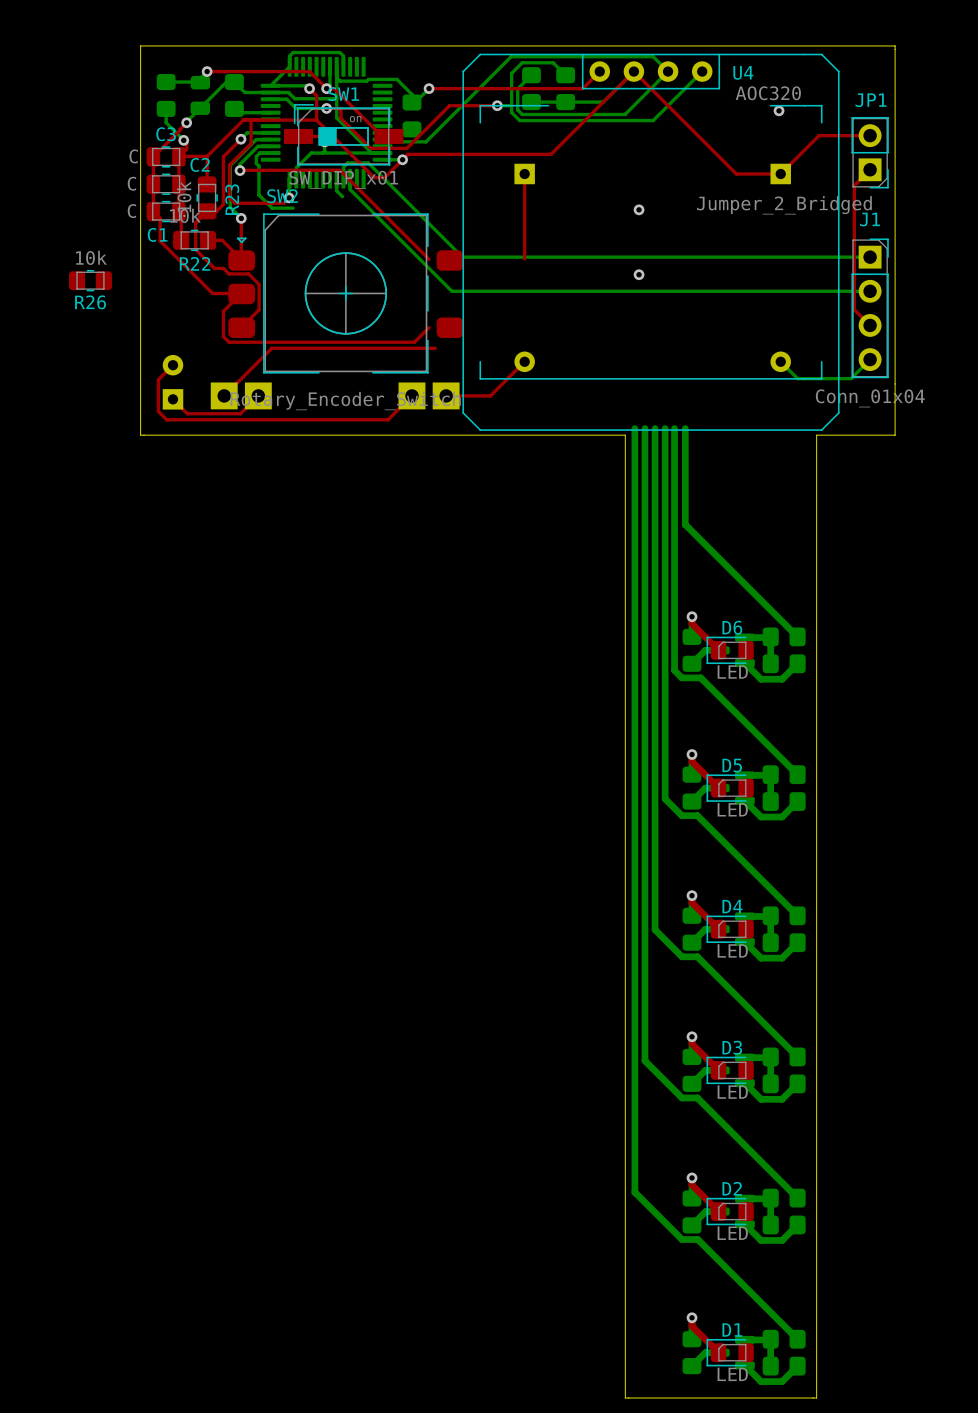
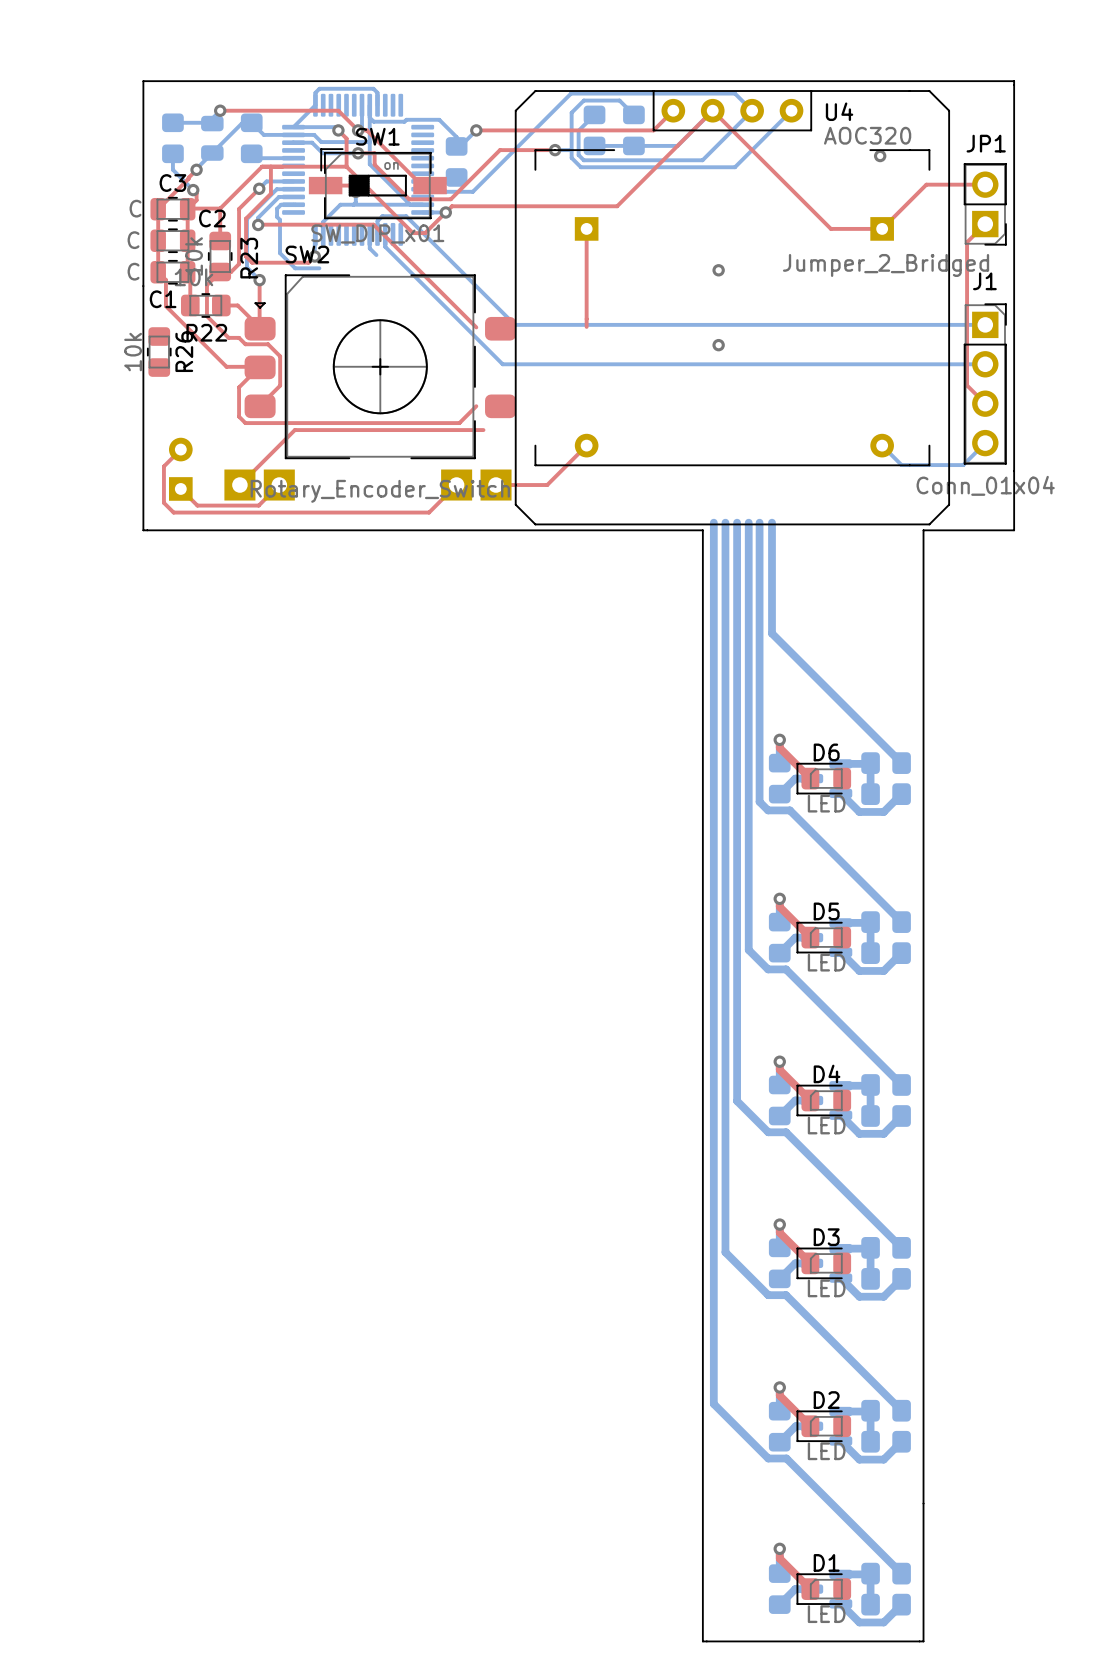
R26 value position: 10k (91, 257) -> 10k (133, 352)
R26 rotation: 0° (90, 280) -> 90° clockwise (159, 352)
R26 position: (90, 280) -> (159, 352)
R26 name position: R26 (90, 302) -> R26 (184, 351)

